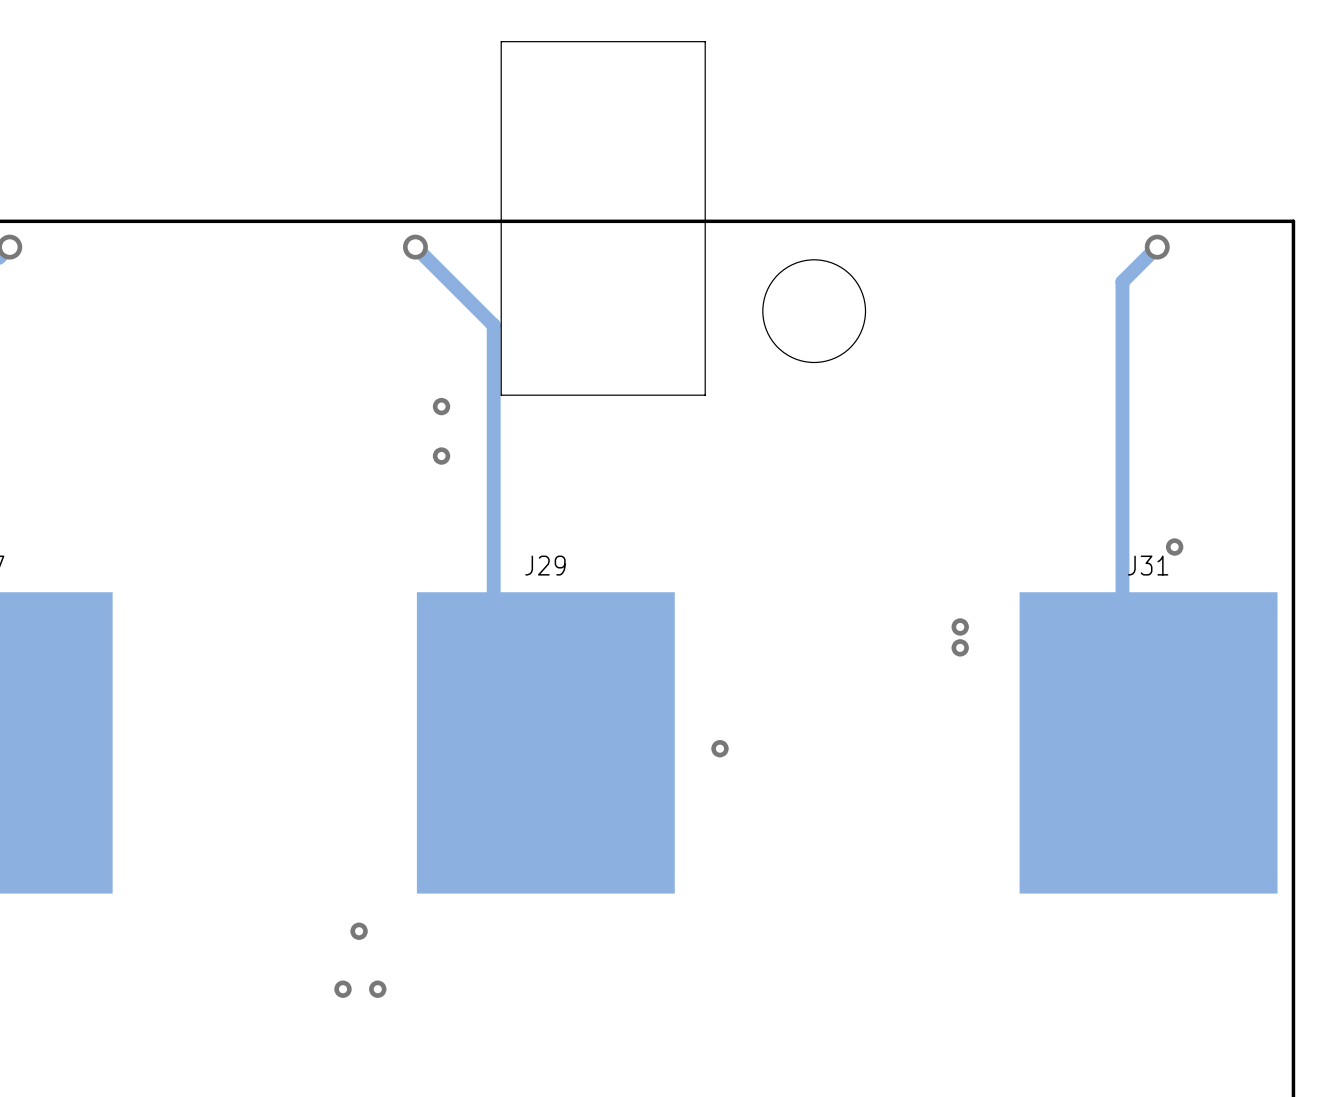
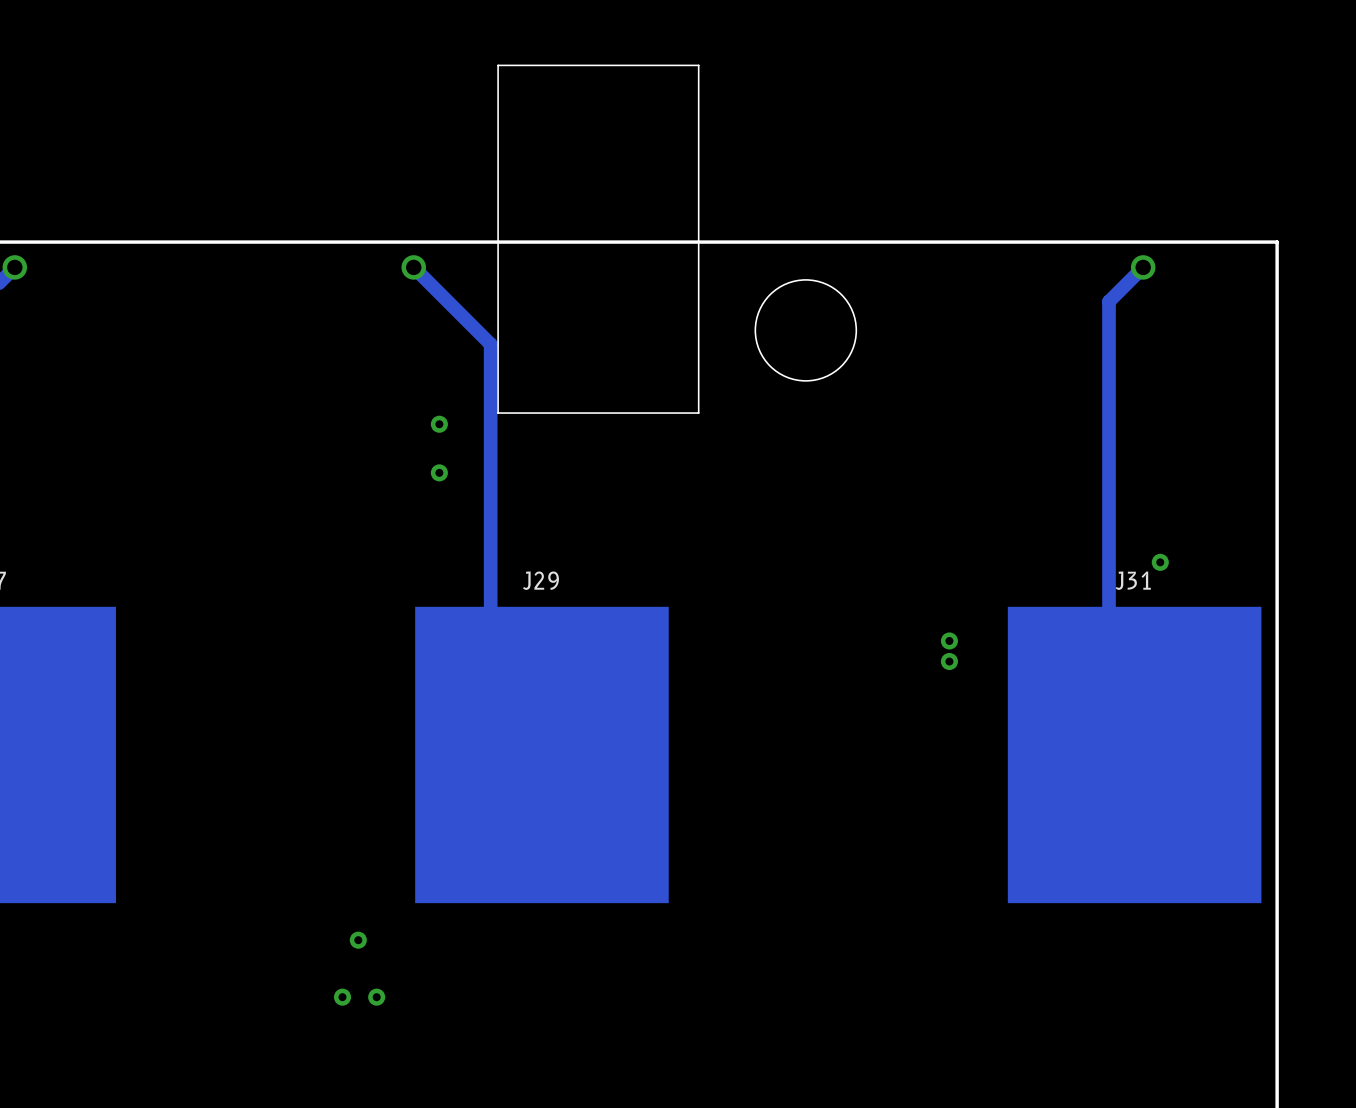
via: (719, 748) -> none

